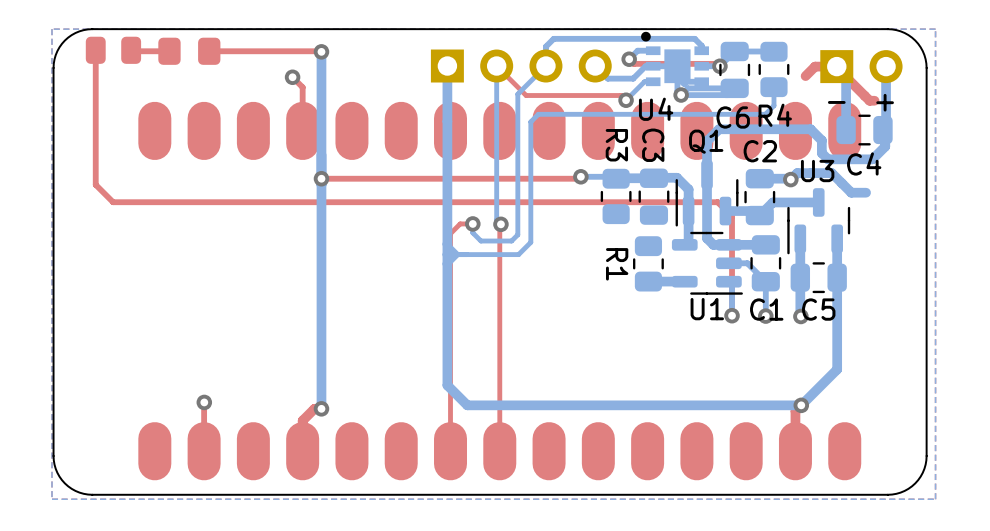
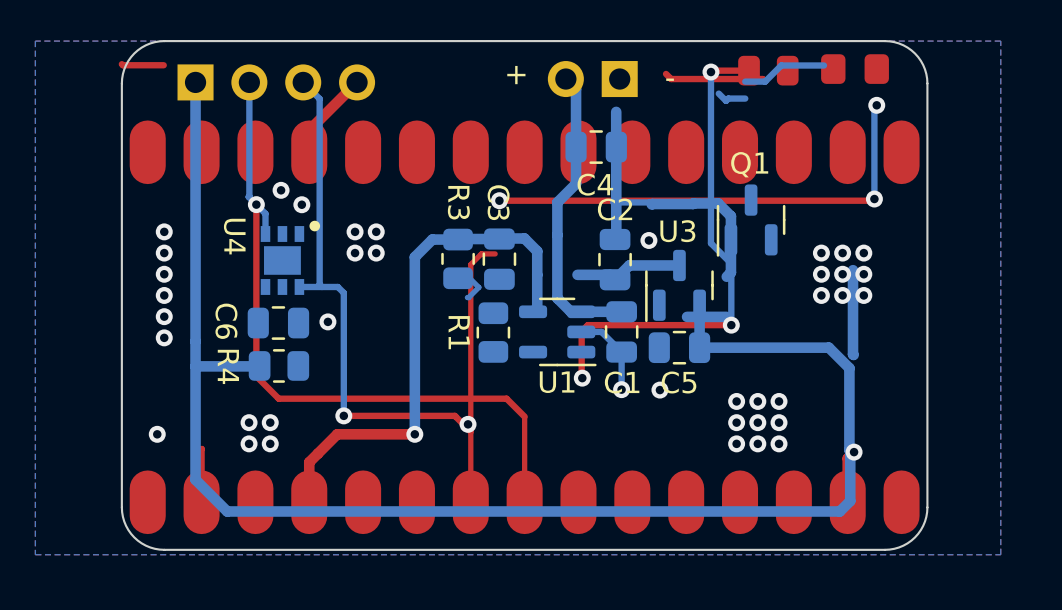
board edge: (169, 29) (92, 29) (79, 31) (62, 43) (55, 55) (53, 67) (54, 464) (64, 483) (83, 493) (169, 494) -> (164, 41) (150, 43) (134, 53) (126, 65) (121, 83) (122, 512) (128, 530) (137, 540) (150, 547) (164, 549)
board edge: (829, 29) (887, 29) (900, 31) (918, 43) (924, 55) (926, 67) (925, 464) (915, 483) (900, 492) (887, 494) (829, 494) -> (885, 41) (899, 43) (914, 53) (925, 69) (927, 83) (927, 512) (923, 525) (914, 537) (899, 547) (885, 549)
top track: (95, 50) (95, 184) (113, 202) (717, 202) (732, 216) (732, 315) -> none
part: (113, 50) -> none
bottom track: (653, 50) (637, 50) (629, 59) -> none
bottom track: (701, 50) (701, 45) (694, 38) (553, 38) (545, 46) (545, 66) (517, 94) (517, 234) (511, 241) (480, 241) (472, 232) (472, 223) -> none
part: (189, 51) -> none
top track: (209, 51) (321, 51) -> none
via: (321, 51) -> none
part: none -> (855, 69)
top track: none -> (749, 70) (710, 72)
part: none -> (768, 70)
bottom track: none -> (710, 72) (710, 243) (731, 263) (731, 328)
via: none -> (710, 72)
U4 rotation: 0° (675, 58) -> 90° clockwise (290, 257)
U4 position: (675, 58) -> (290, 257)
via: (629, 59) -> none
bottom track: none -> (565, 79) (576, 89) (576, 183) (557, 202) (557, 298) (570, 311) (621, 311)
bottom track: none -> (195, 82) (195, 479) (227, 511) (839, 511) (850, 501) (849, 368) (828, 347) (699, 347) (699, 305)
bottom track: none -> (249, 82) (248, 196) (265, 213) (265, 233)
bottom track: none -> (303, 82) (319, 98) (319, 284) (321, 286)
top track: (496, 66) (526, 95) (621, 95) (626, 100) -> none
bottom track: (496, 66) (496, 220) (500, 224) -> none
part position: (521, 66) -> (276, 82)
bottom track: (595, 66) (607, 78) (633, 78) (645, 66) (677, 66) (677, 91) (681, 95) -> none
via: (719, 66) -> none
bottom track: (836, 66) (846, 75) (846, 130) -> none
part rotation: 0° (861, 66) -> 180° (592, 79)
part position: (861, 66) -> (592, 79)
bottom track: (886, 66) (886, 126) (882, 130) (885, 132) (885, 146) (872, 159) (828, 159) (821, 153) (821, 140) (810, 129) (719, 129) (707, 141) (707, 238) (713, 244) (765, 244) -> none
C6 rotation: 0° (734, 69) -> 90° clockwise (278, 323)
C6 position: (734, 69) -> (278, 323)
R4 rotation: 0° (773, 69) -> 90° clockwise (278, 365)
R4 position: (773, 69) -> (278, 365)
top track: (805, 76) (815, 66) (836, 66) (869, 100) (874, 100) -> none
top track: (292, 77) (302, 87) (302, 110) -> (357, 82) (309, 130)
via: (292, 77) -> none
bottom track: (653, 81) (644, 81) (626, 100) -> none
bottom track: (773, 87) (773, 105) (765, 114) (538, 114) (530, 121) (530, 242) (518, 254) (447, 254) -> none
bottom track: none -> (876, 105) (874, 107) (874, 199)
via: none -> (876, 105)
bottom track: none -> (616, 111) (616, 238)
bottom track: (681, 95) (687, 88) (734, 88) (727, 95) (681, 95) -> none
via: (681, 95) -> none
via: (626, 100) -> none
text position: - (836, 102) -> - (670, 79)
text position: + (885, 102) -> + (516, 75)
bottom track: (447, 105) (447, 66) (447, 385) (467, 405) (801, 405) (837, 369) (837, 238) -> none
C4 position: (864, 130) -> (596, 147)
via: none -> (281, 190)
top track: none -> (874, 199) (872, 200) (499, 200)
via: none -> (874, 199)
via: none -> (499, 200)
top track: (580, 176) (578, 178) (321, 178) -> none
via position: (580, 176) -> (648, 240)
via: none -> (256, 204)
via: none -> (301, 204)
bottom track: (321, 178) (321, 51) (321, 408) -> none
via: (321, 178) -> none
bottom track: (759, 178) (790, 179) (797, 173) (831, 173) (851, 192) (866, 192) -> none
via: (790, 179) -> none
R3 position: (616, 196) -> (458, 258)
C3 position: (653, 196) -> (499, 259)
C2 position: (759, 197) -> (615, 259)
bottom track: (818, 202) (772, 202) (759, 215) (755, 211) (725, 211) -> (679, 265) (629, 265) (615, 279) (610, 274) (577, 274)
via: none -> (164, 231)
via: none -> (355, 231)
via: none -> (376, 231)
U3 position: (818, 221) -> (679, 285)
via: none -> (164, 253)
via: none -> (355, 253)
via: none -> (376, 253)
via: (472, 223) -> none
via: none -> (821, 253)
via: none -> (842, 253)
via: none -> (863, 253)
top track: (500, 224) (499, 372) -> (256, 204) (256, 376) (278, 398) (506, 398) (524, 416)
via: (500, 224) -> none
via: none -> (164, 274)
via: none -> (821, 274)
via: none -> (842, 274)
via: none -> (863, 274)
bottom track: none -> (299, 286) (337, 286) (343, 292) (343, 415)
via: none -> (164, 295)
via: none -> (821, 295)
via: none -> (842, 295)
via: none -> (863, 295)
R1 position: (648, 263) -> (493, 332)
U1 position: (707, 263) -> (557, 331)
bottom track: (728, 263) (747, 263) (765, 281) (765, 316) -> (581, 331) (601, 331) (621, 352) (621, 389)
C1 position: (765, 263) -> (621, 331)
bottom track: none -> (533, 311) (537, 307) (537, 251) (524, 238) (432, 239) (414, 257) (414, 434)
C5 position: (818, 277) -> (679, 347)
via: none -> (164, 316)
bottom track: (728, 281) (732, 284) (732, 315) -> none
via: none -> (327, 321)
top track: none -> (731, 325) (587, 325) (581, 331) (582, 378)
via: none -> (731, 325)
via: none -> (164, 337)
via: (732, 315) -> none
via: (765, 316) -> none
via: (800, 316) -> none
bottom track: none -> (259, 365) (195, 366)
via: none -> (582, 378)
via: none -> (621, 389)
via: none -> (659, 390)
via: none -> (736, 401)
via: none -> (757, 401)
via: none -> (779, 401)
top track: none -> (343, 415) (454, 415) (470, 431)
via: none -> (343, 415)
via: none -> (249, 422)
via: none -> (270, 422)
via: none -> (736, 422)
via: none -> (757, 422)
via: none -> (779, 422)
via: none -> (468, 424)
via: none -> (157, 434)
via: none -> (414, 434)
via: none -> (249, 443)
via: none -> (270, 443)
via: none -> (736, 443)
via: none -> (757, 443)
via: none -> (779, 443)
via: (204, 402) -> none
top track: (321, 408) (314, 408) (302, 420) -> (414, 434) (337, 434) (309, 462) (309, 468)
via: (321, 408) -> none

